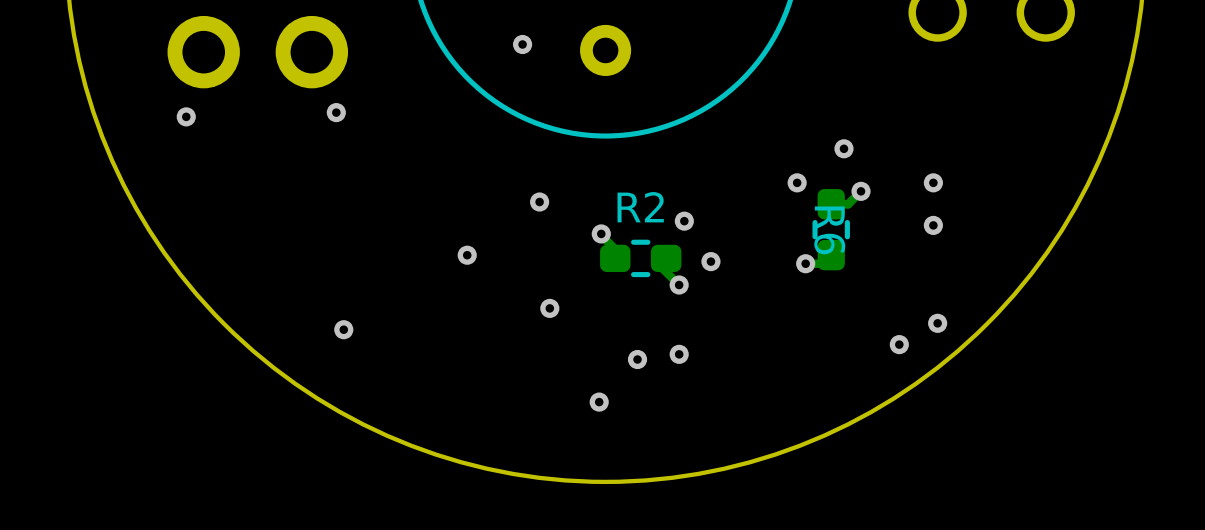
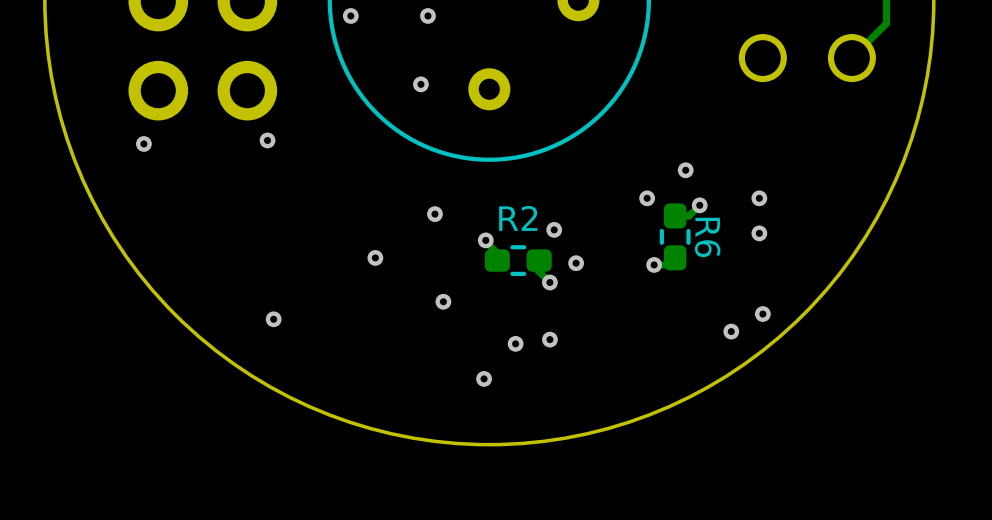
R6 name position: R6 (829, 230) -> R6 (707, 237)

